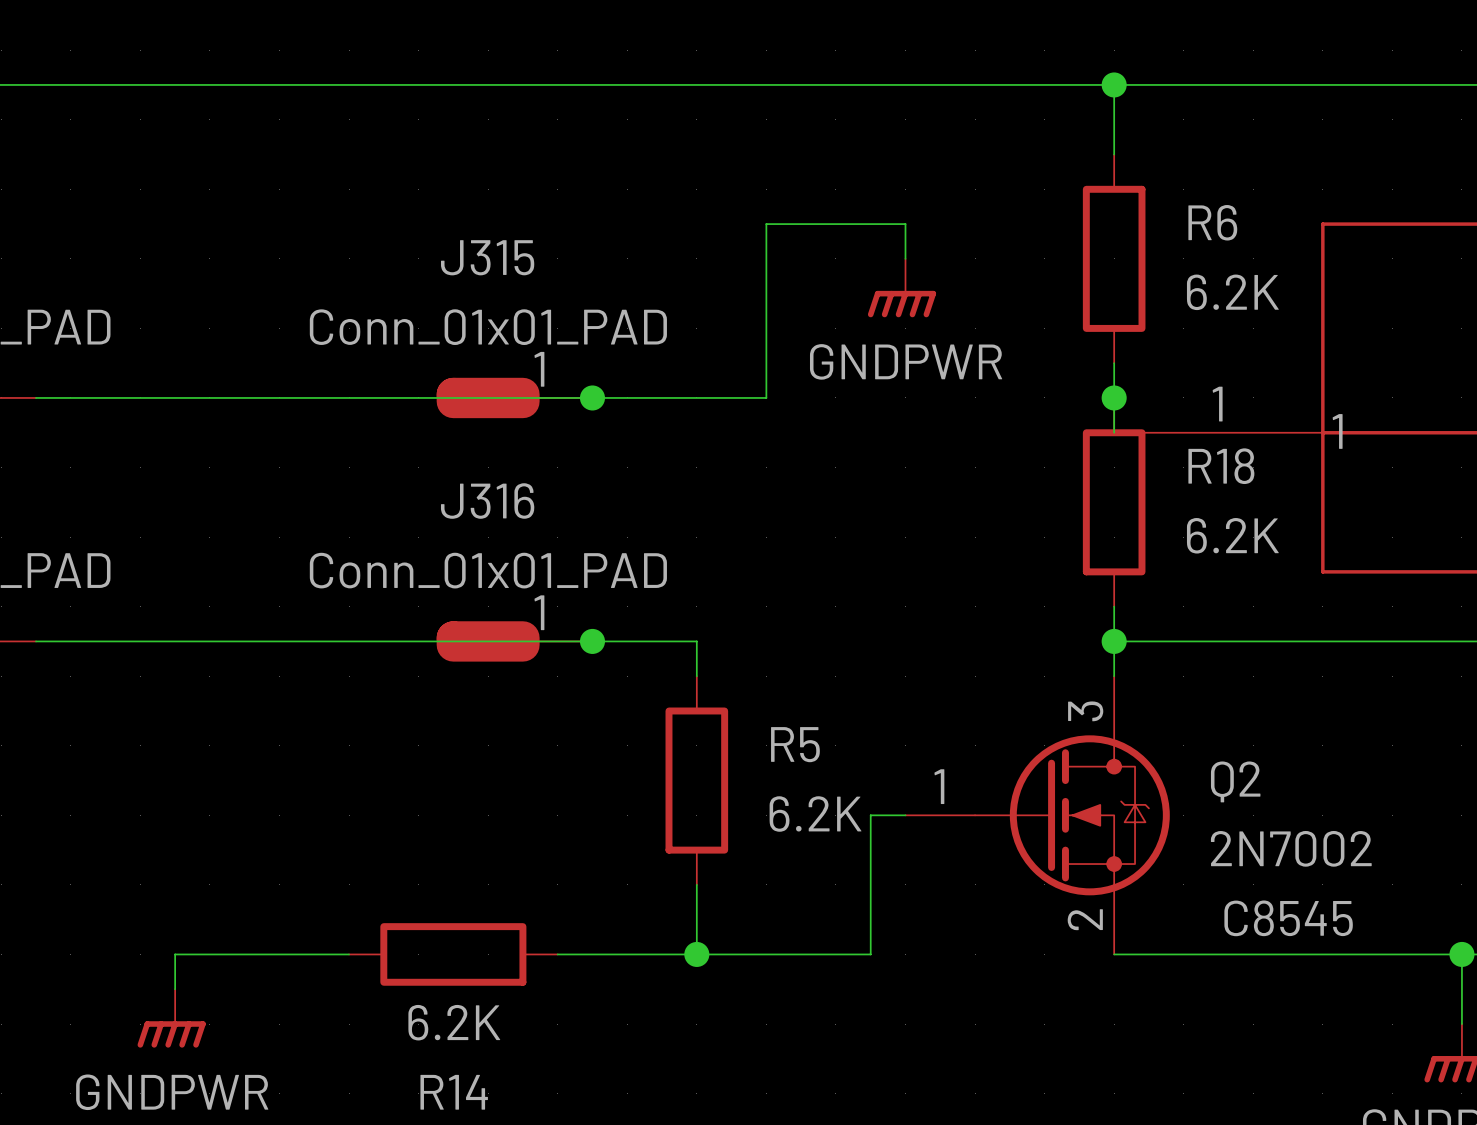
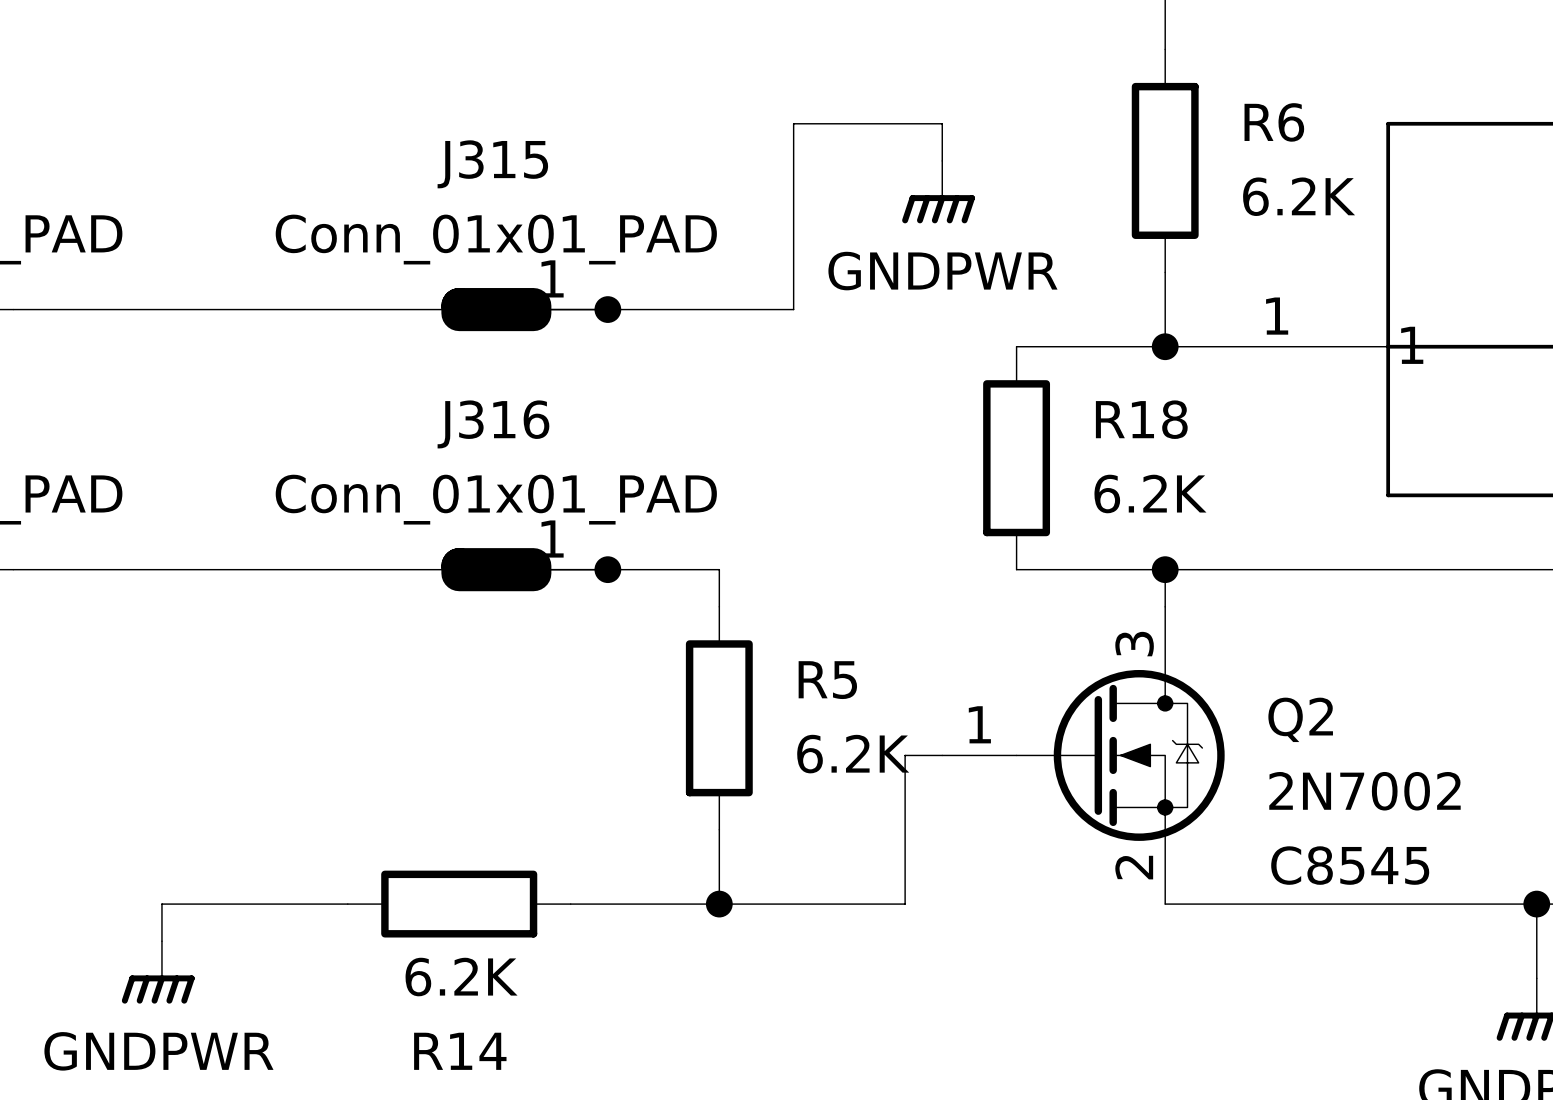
junction position: (1114, 397) -> (1165, 346)
wire: none -> (1016, 346) (1165, 346)
R18 position: (1114, 502) -> (1016, 458)
wire: (1114, 606) (1114, 641) -> (1016, 569) (1165, 569)

